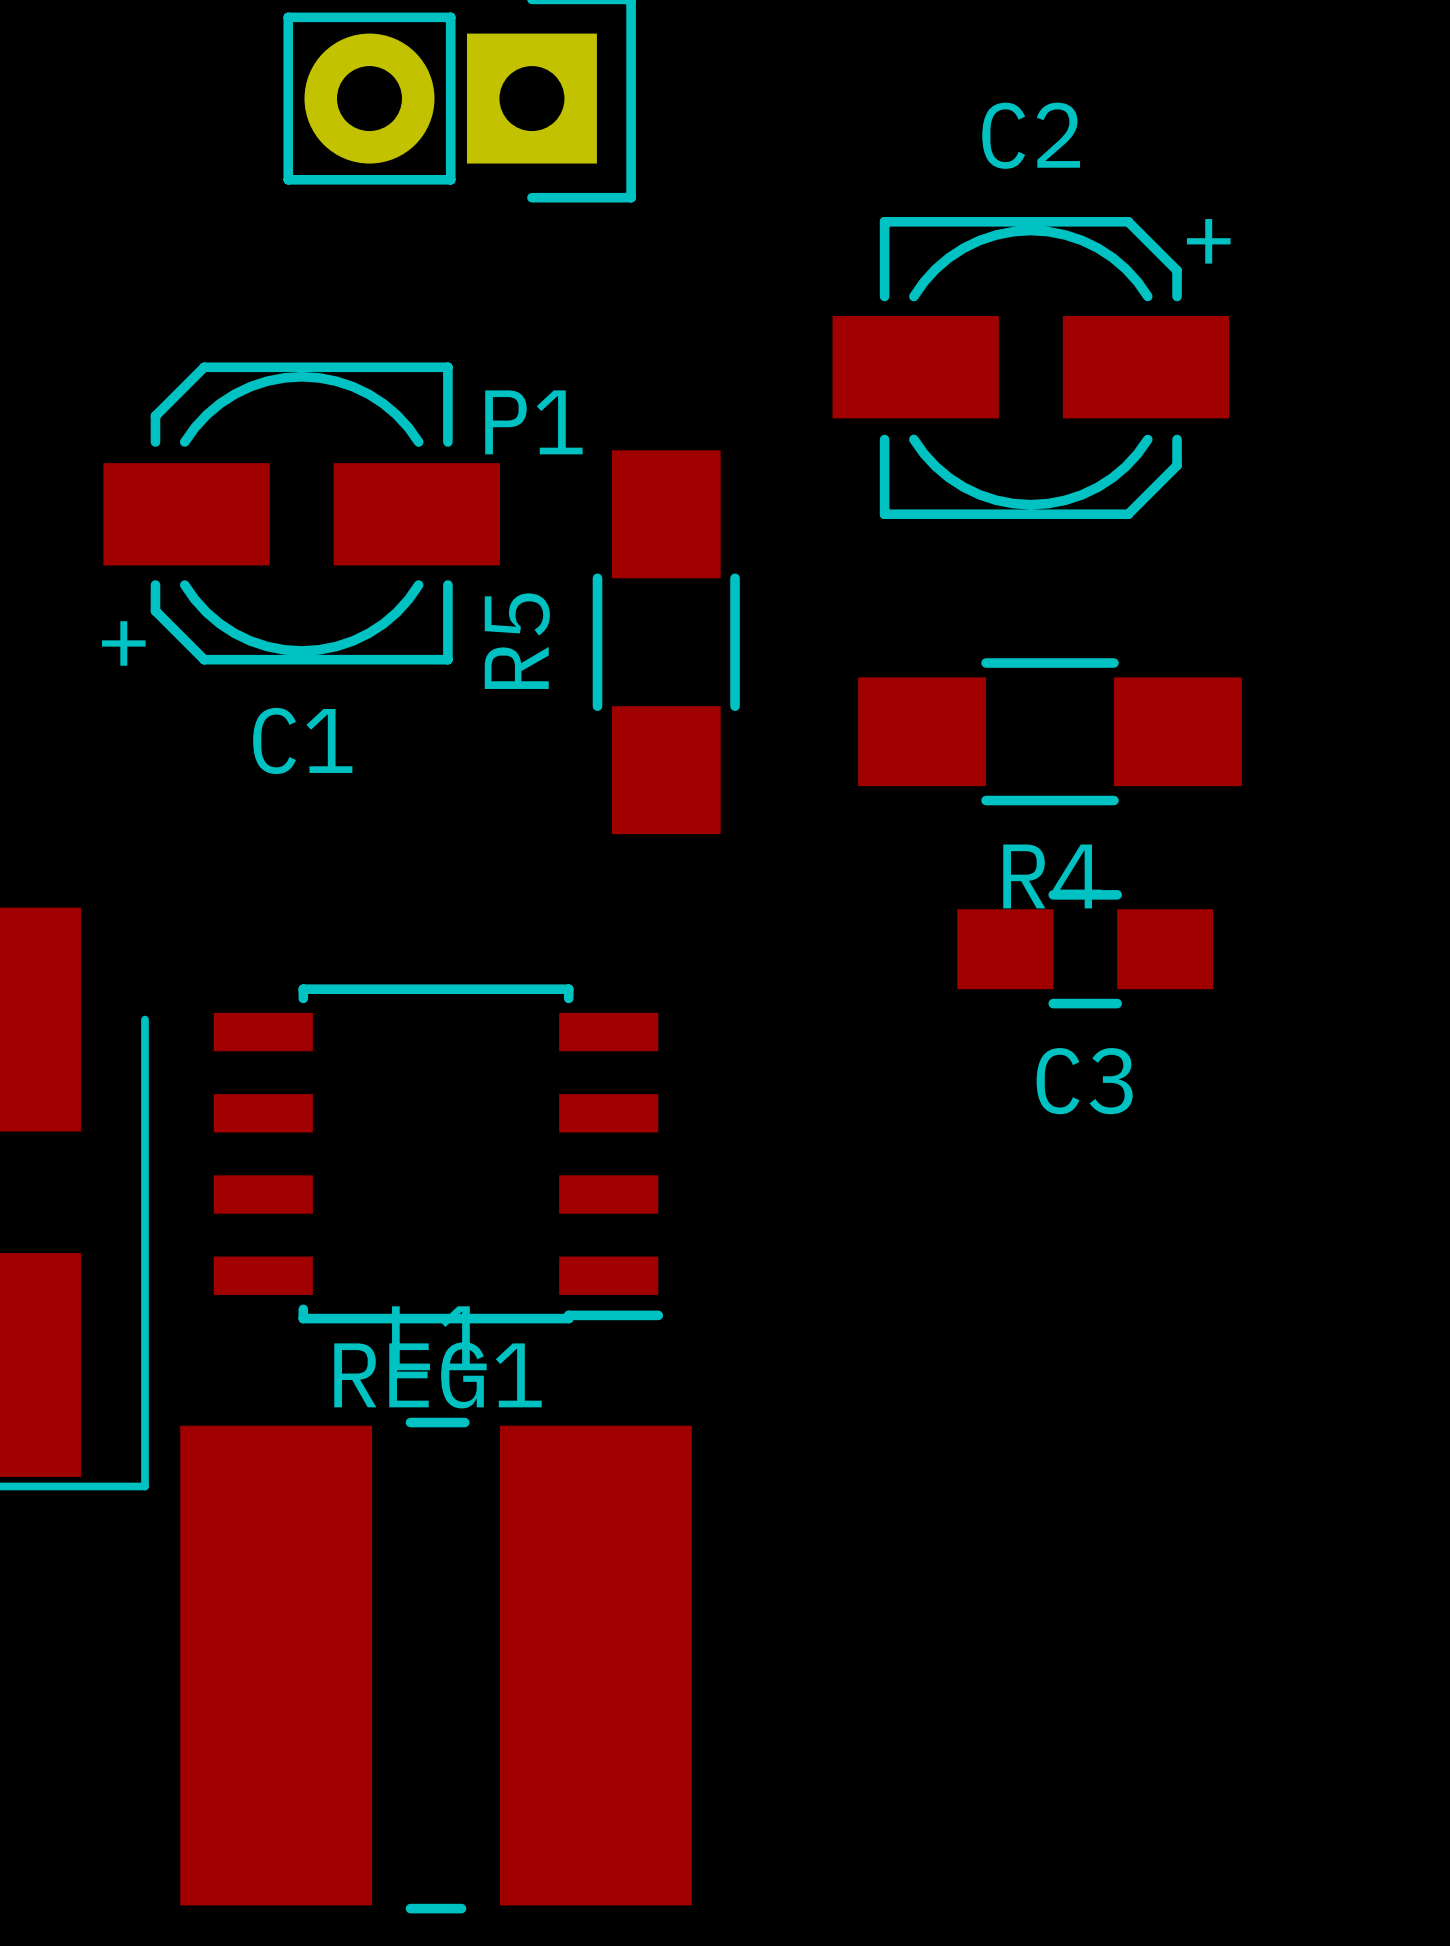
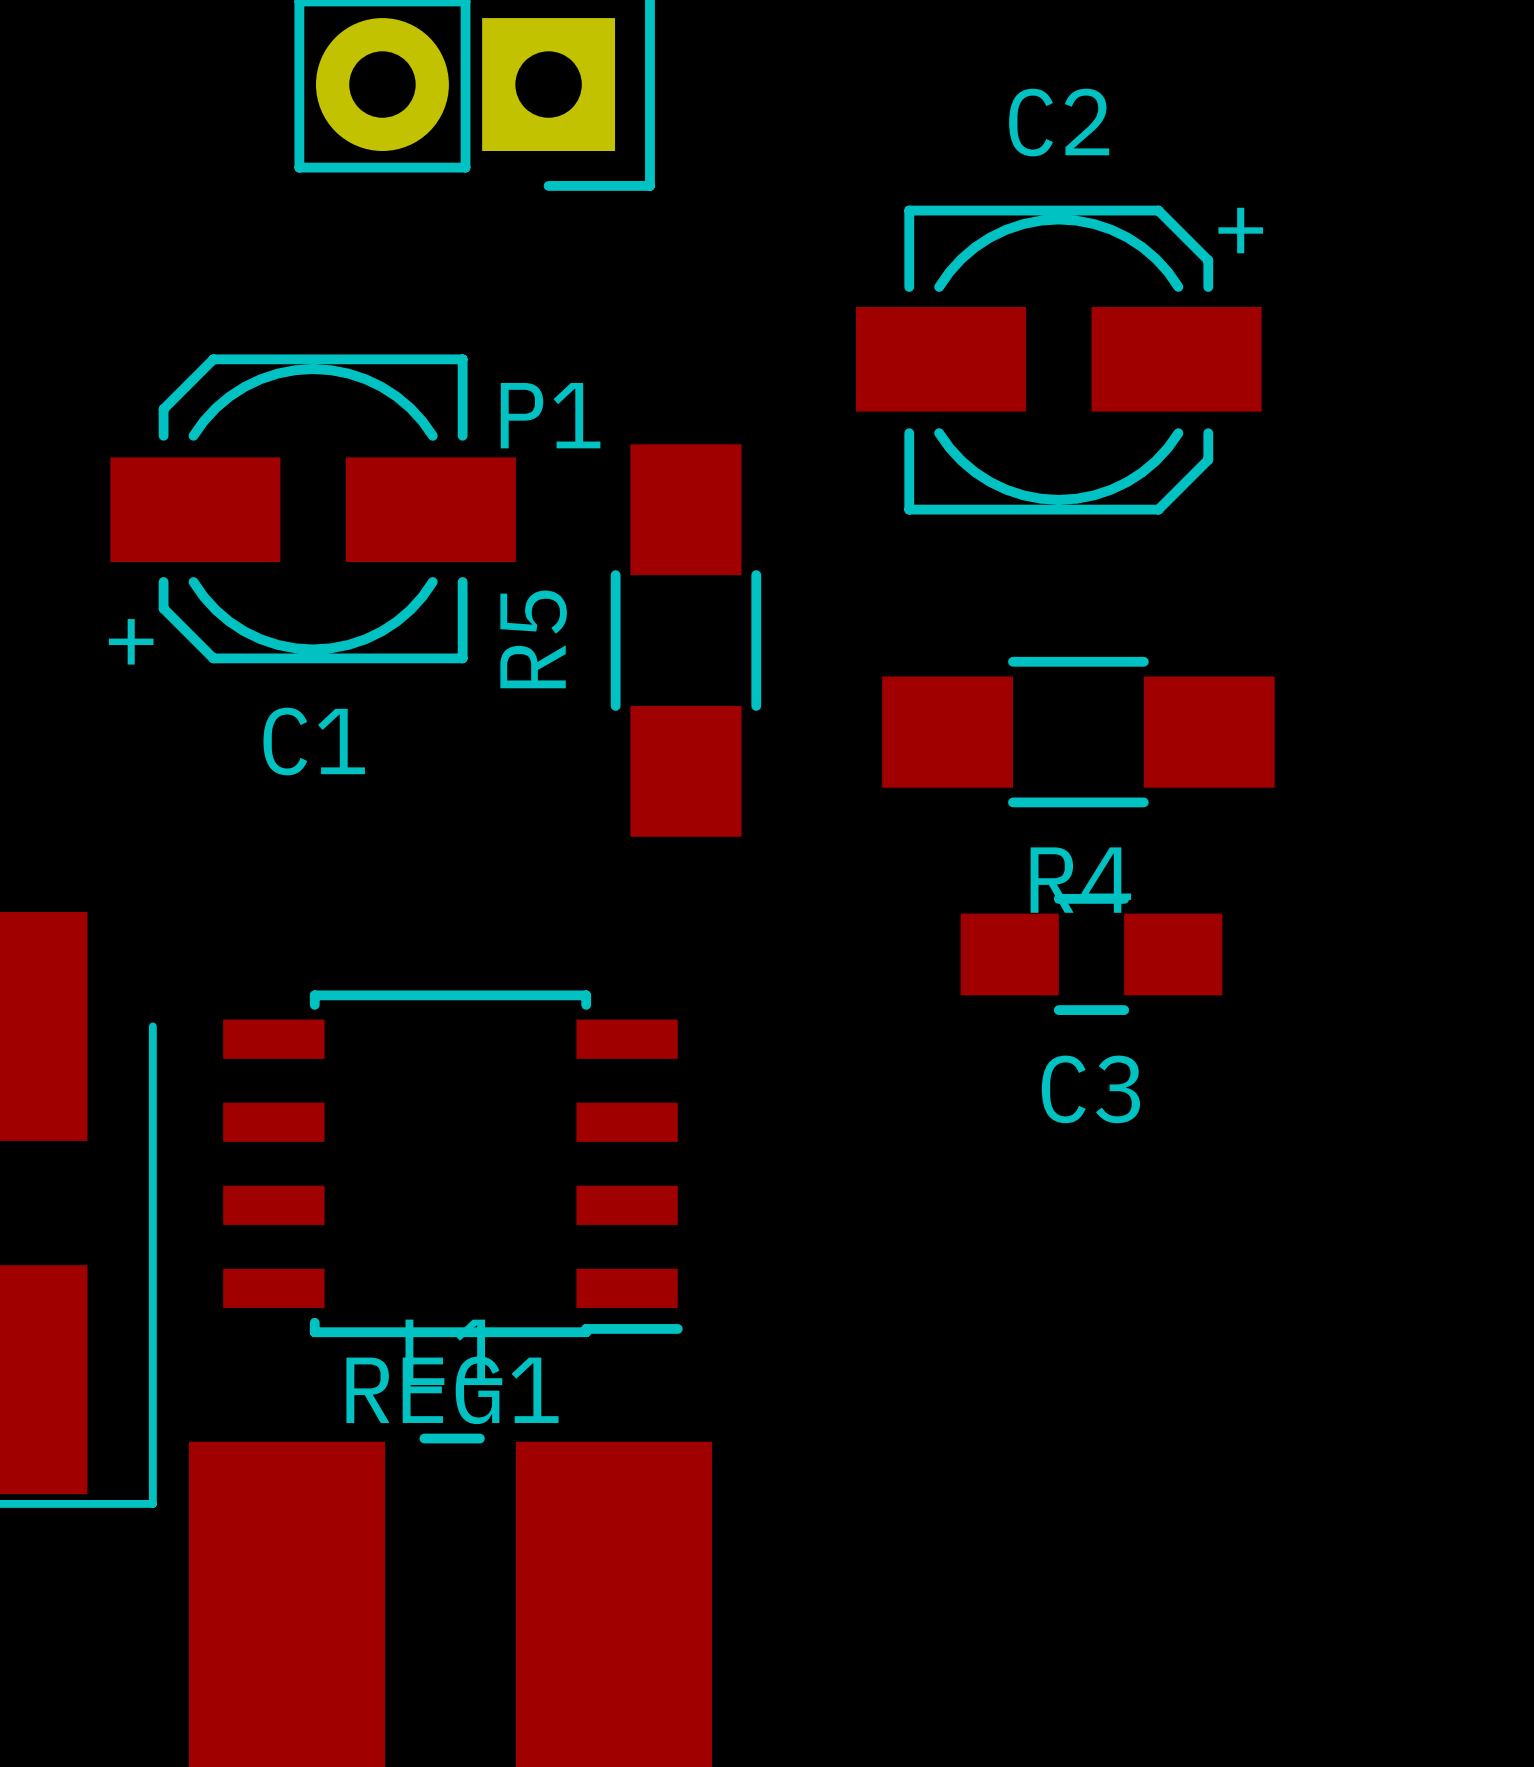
C3 position: (1085, 949) -> (1091, 954)

